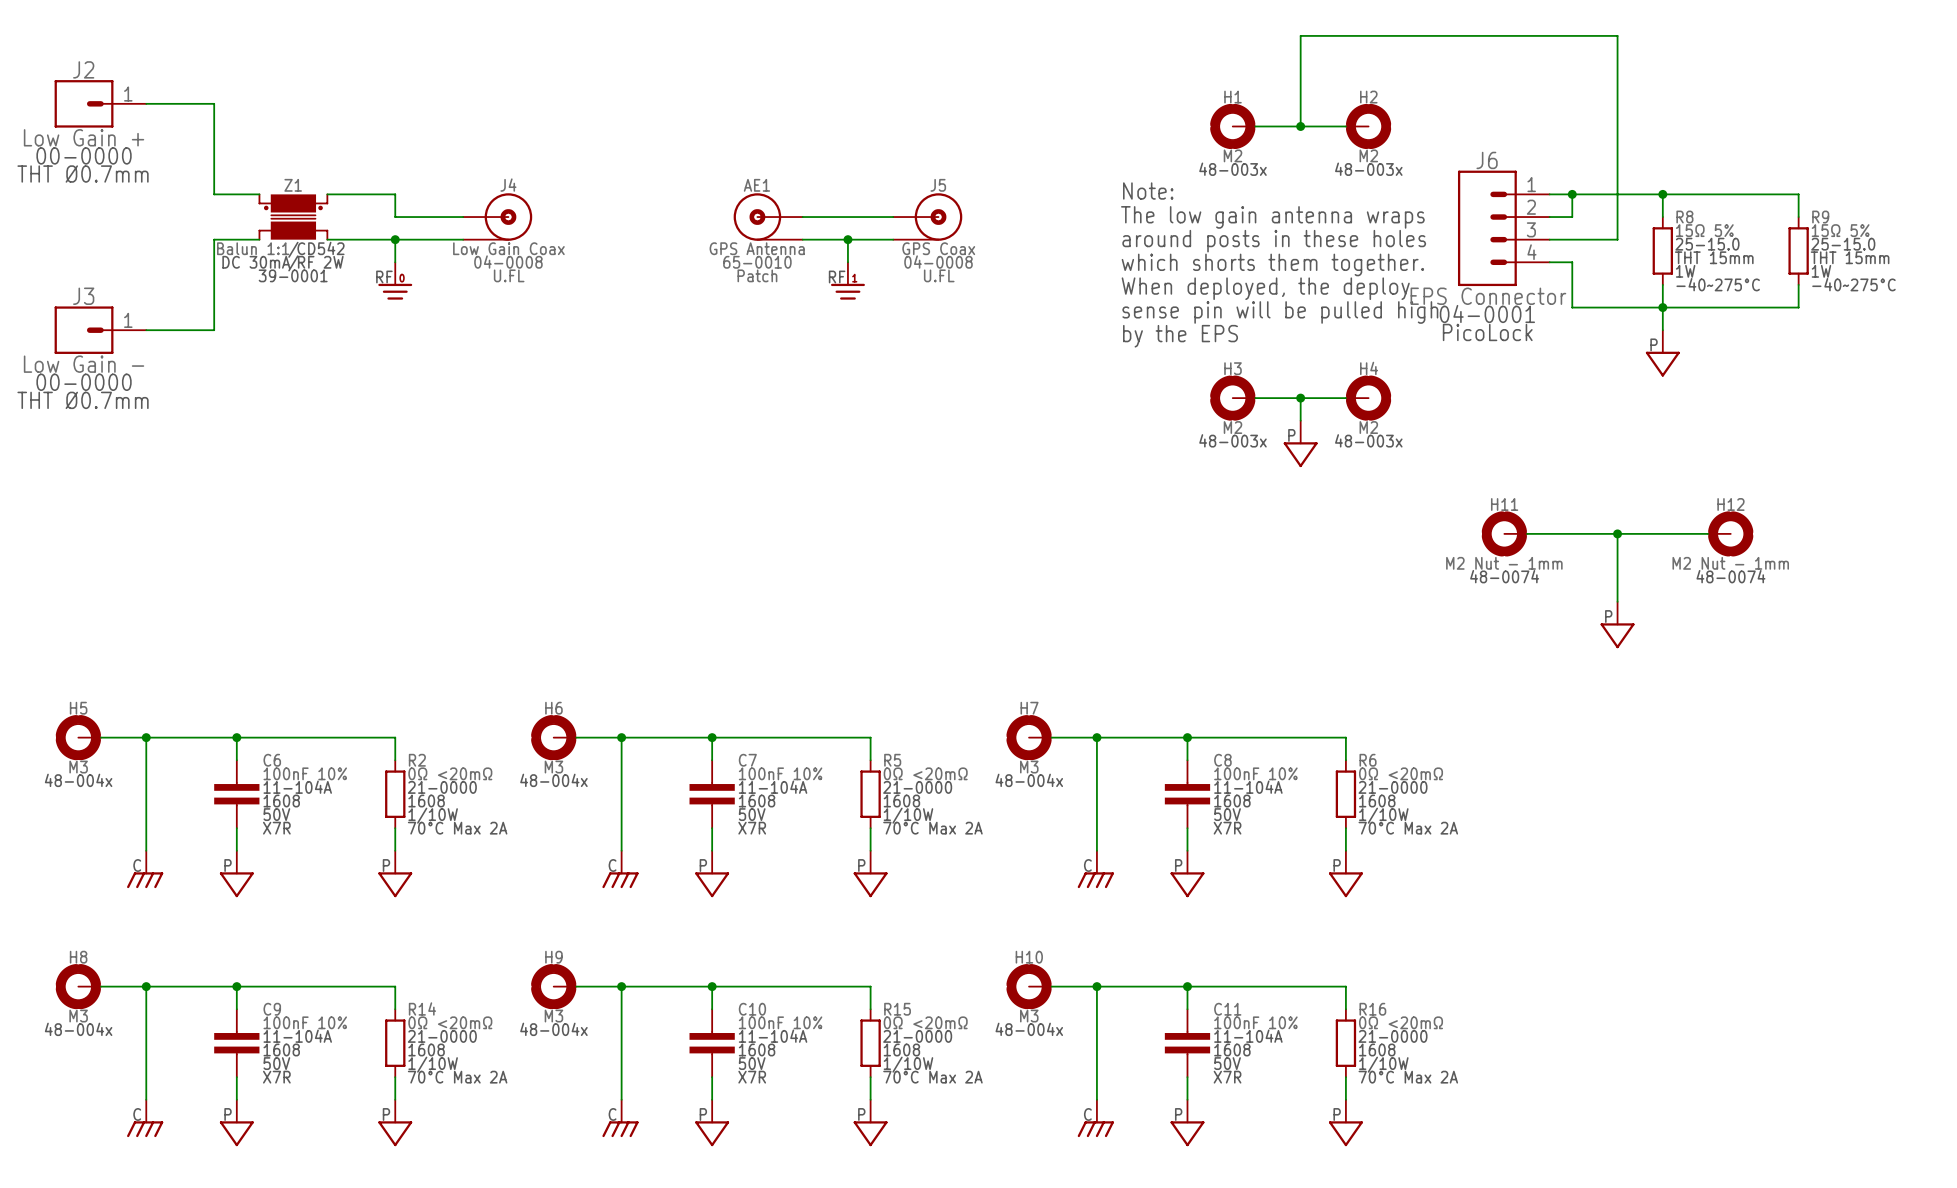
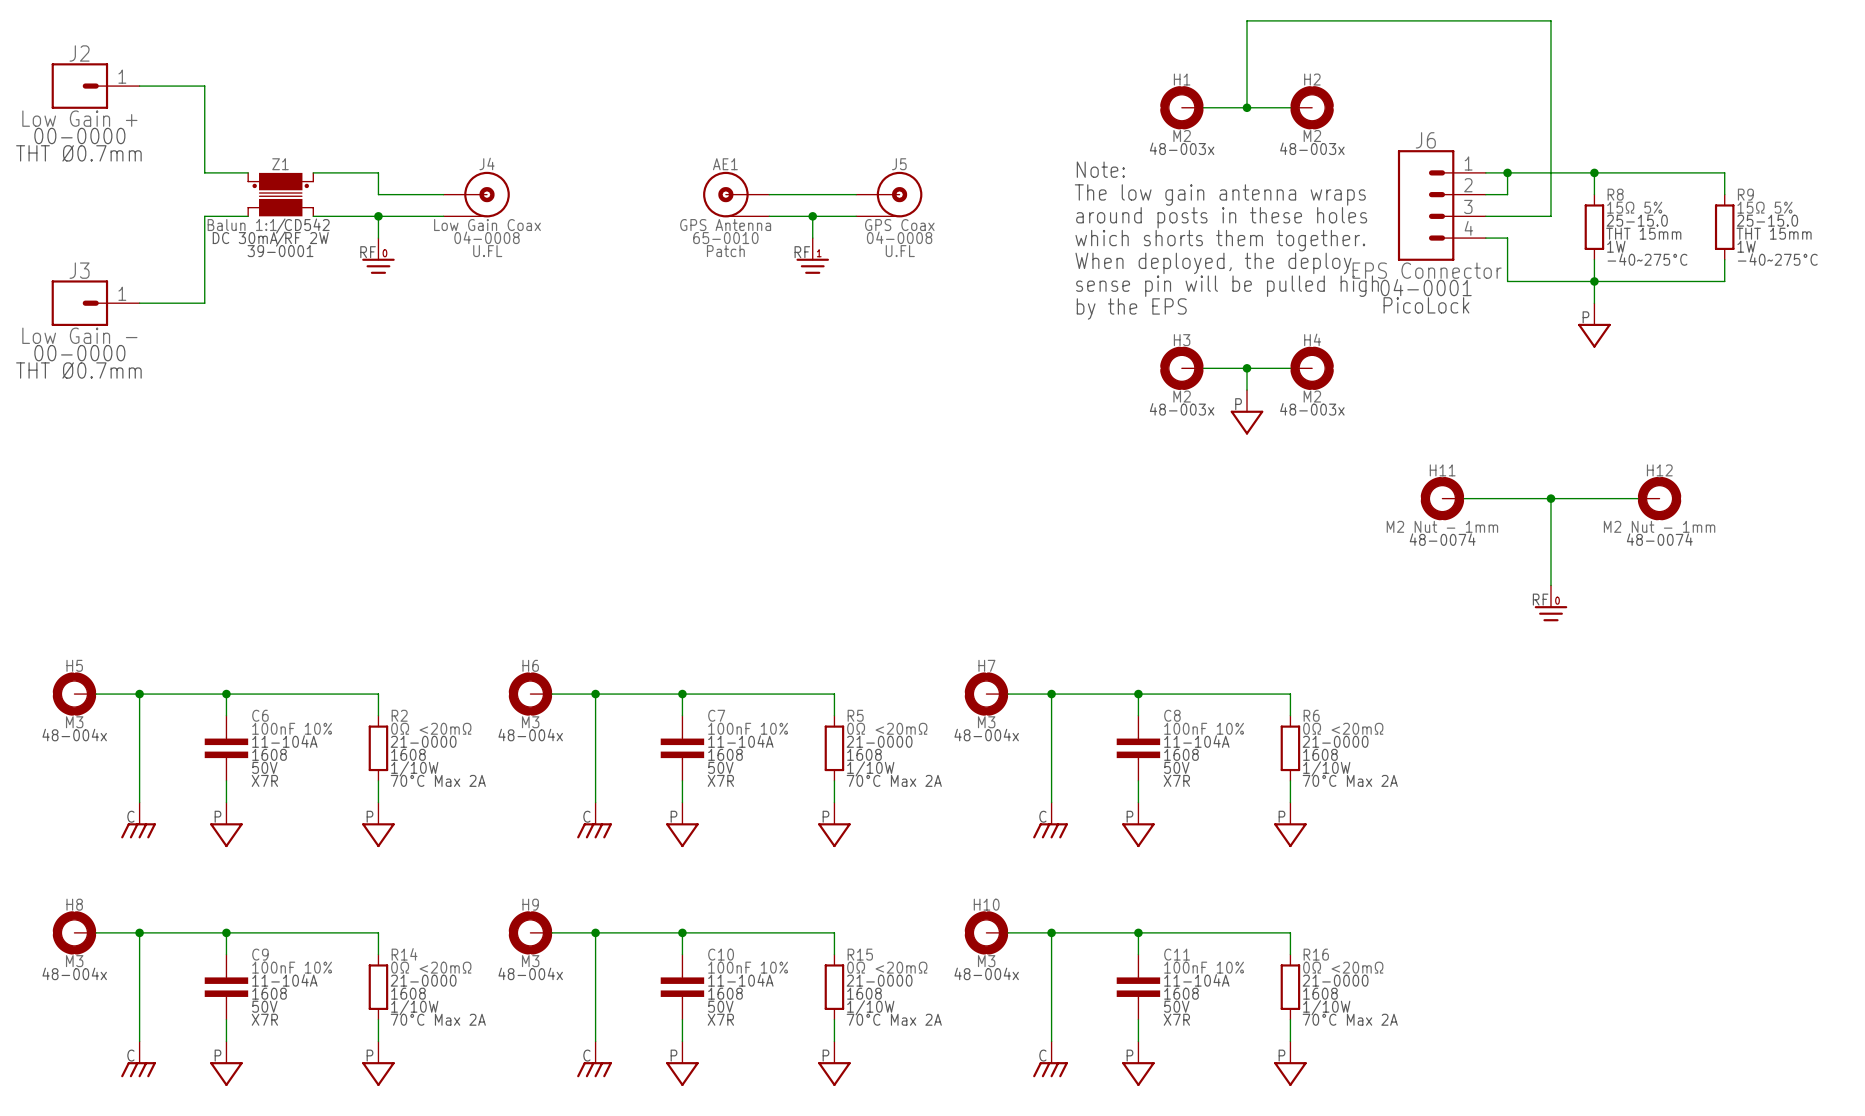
power symbol: (1617, 625) -> none
power symbol: none -> (1550, 603)

